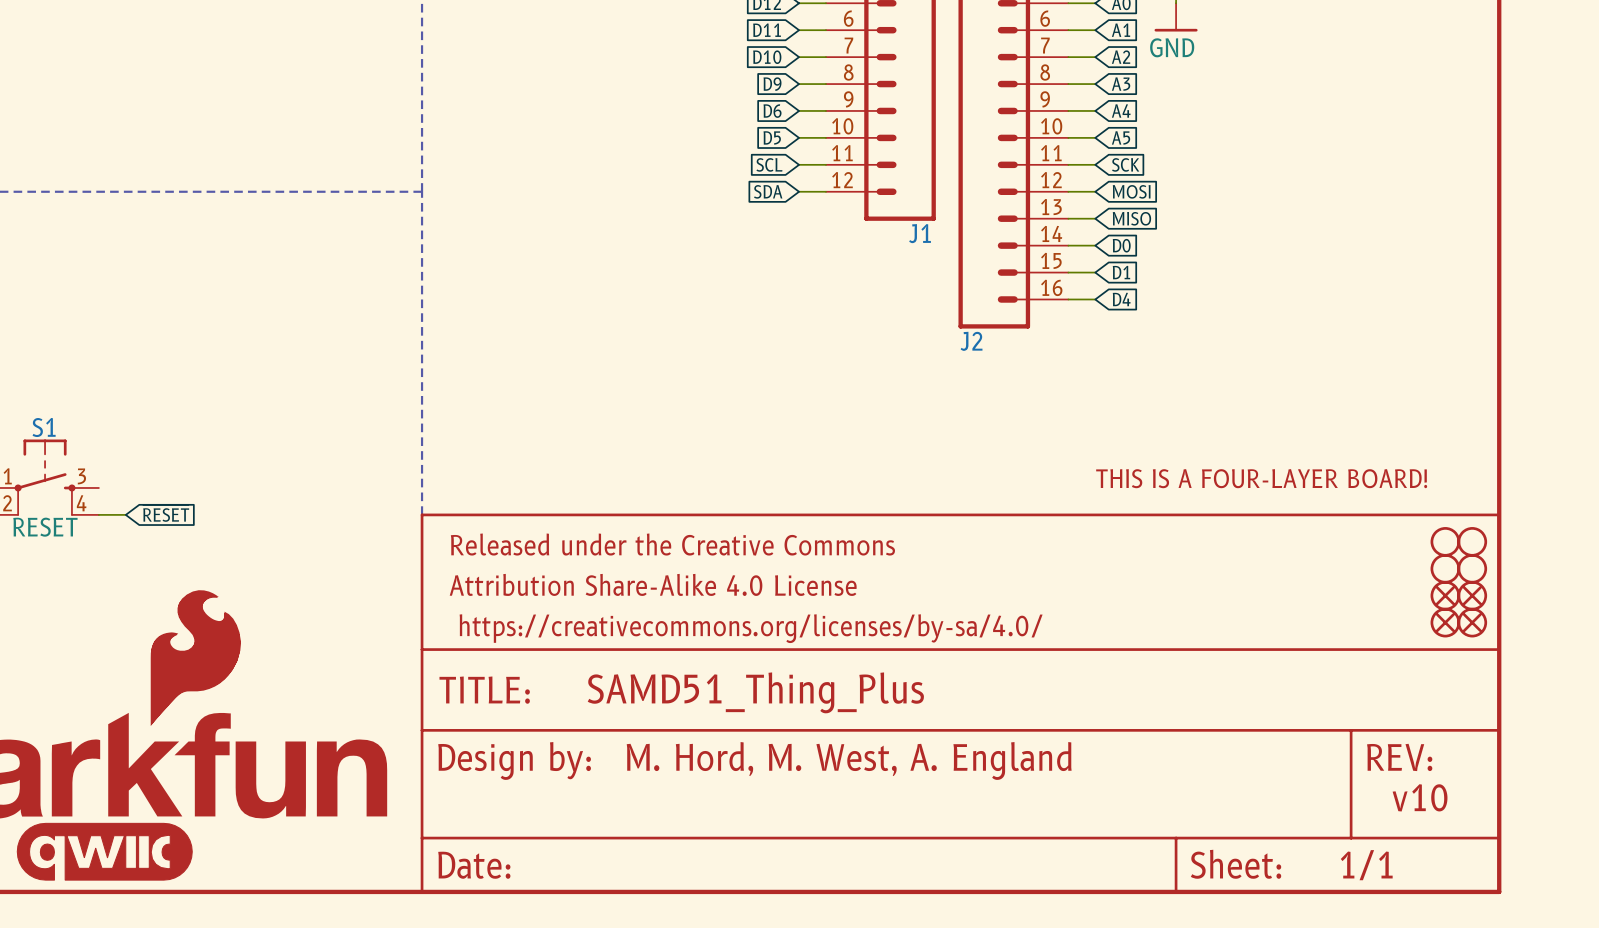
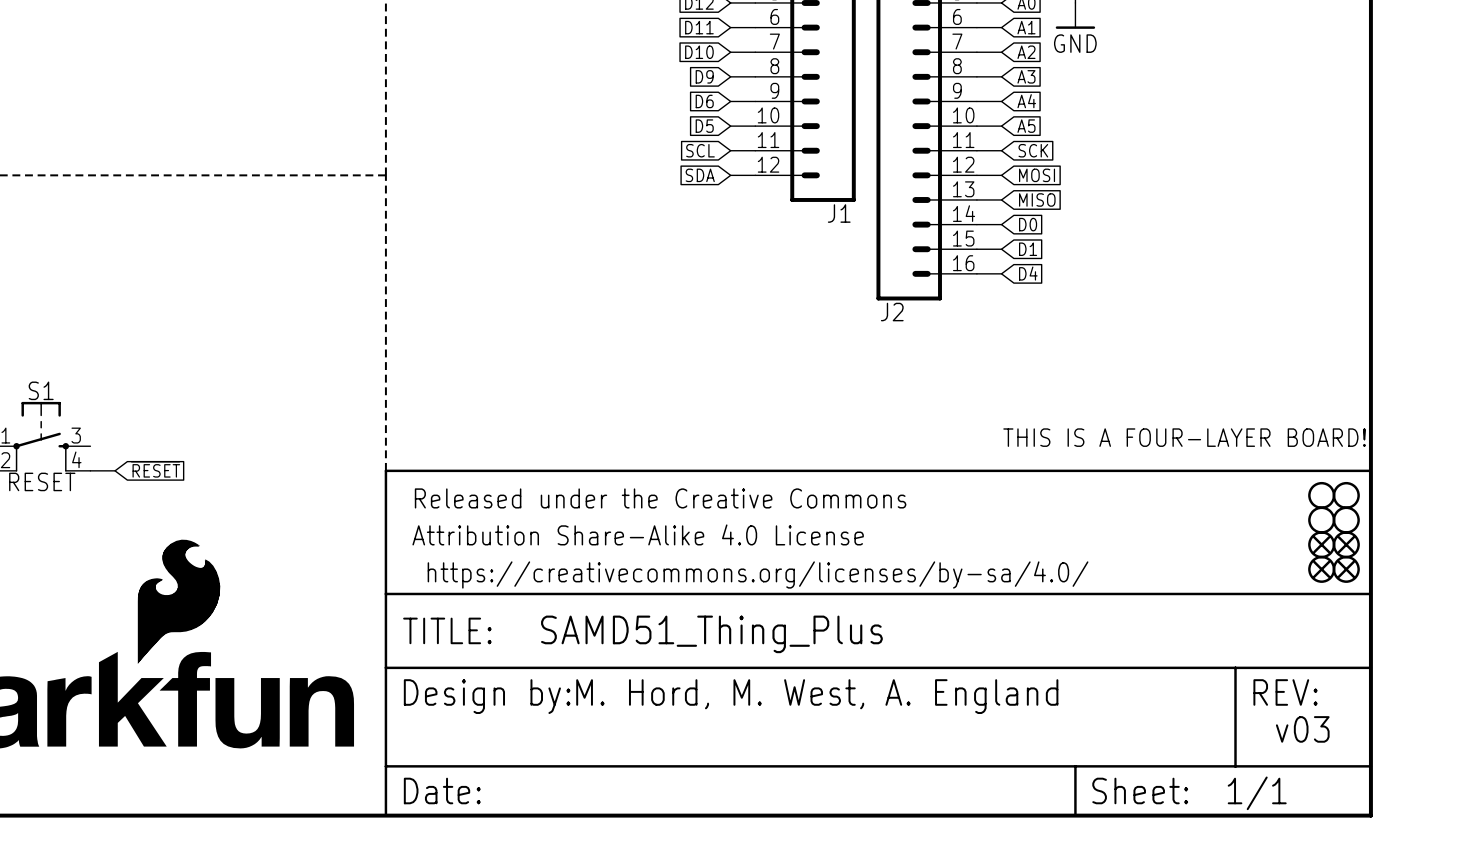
text: v10 (1420, 797) -> v03 (1302, 729)
part: (104, 851) -> none

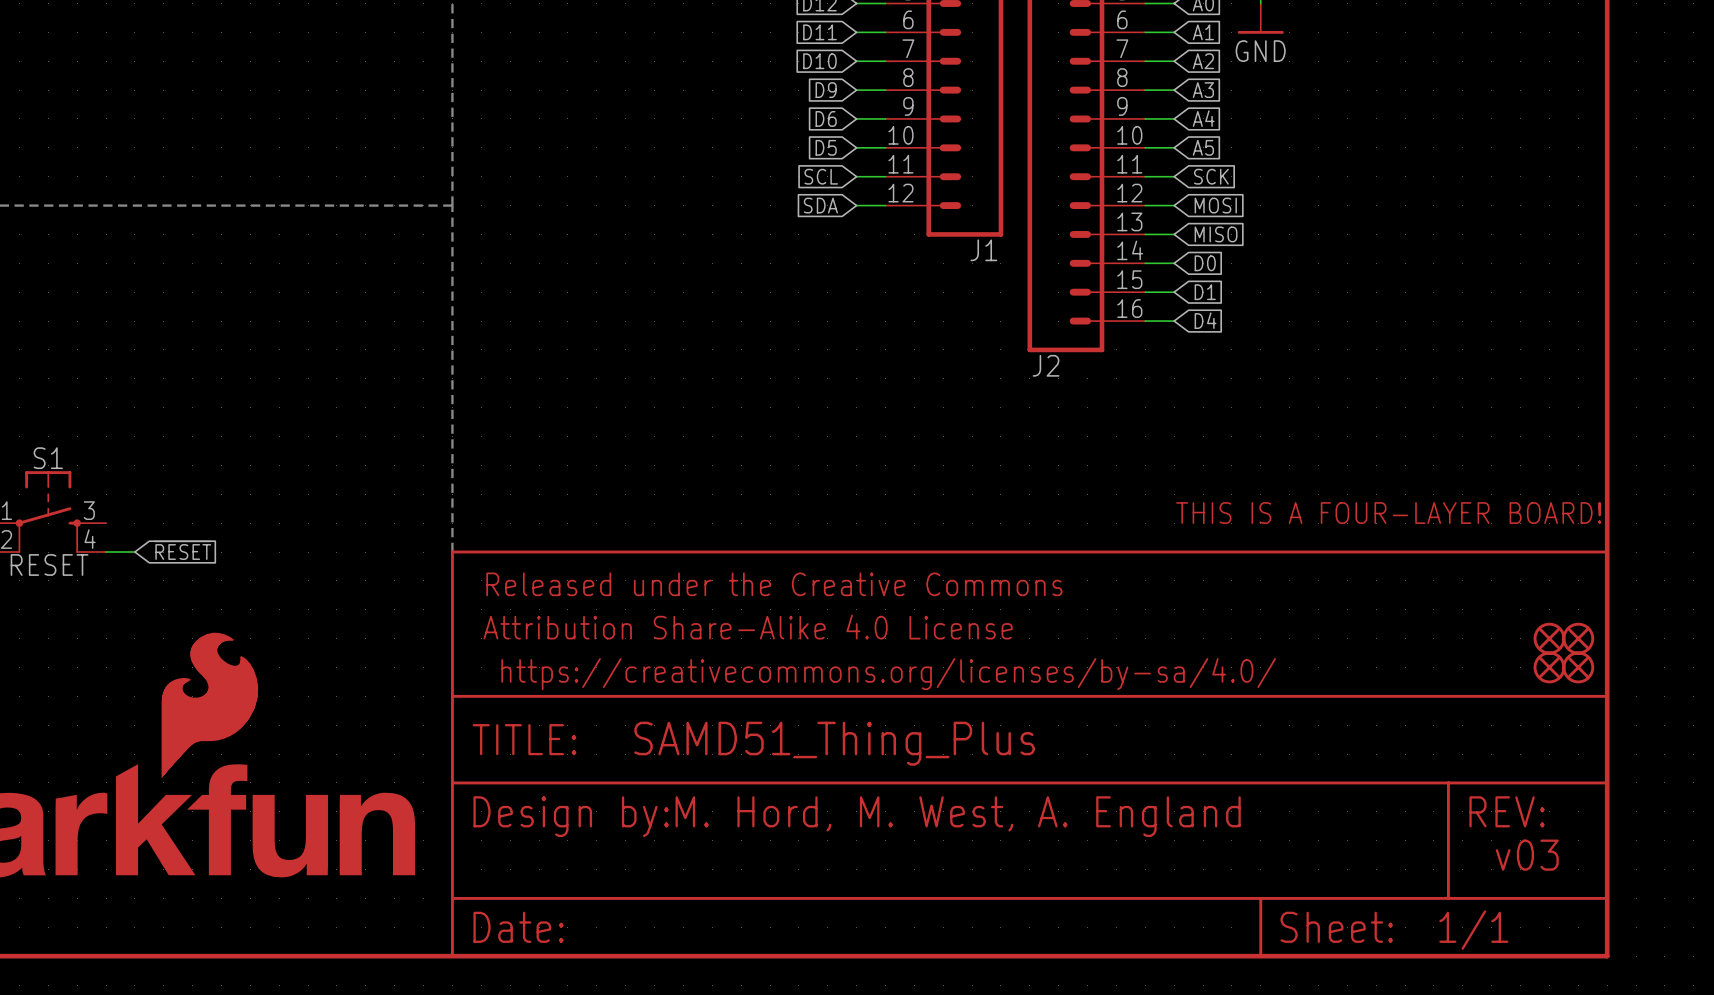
part: (1321, 495) -> none
part: (1346, 495) -> none
part: (1321, 520) -> none
part: (1346, 520) -> none

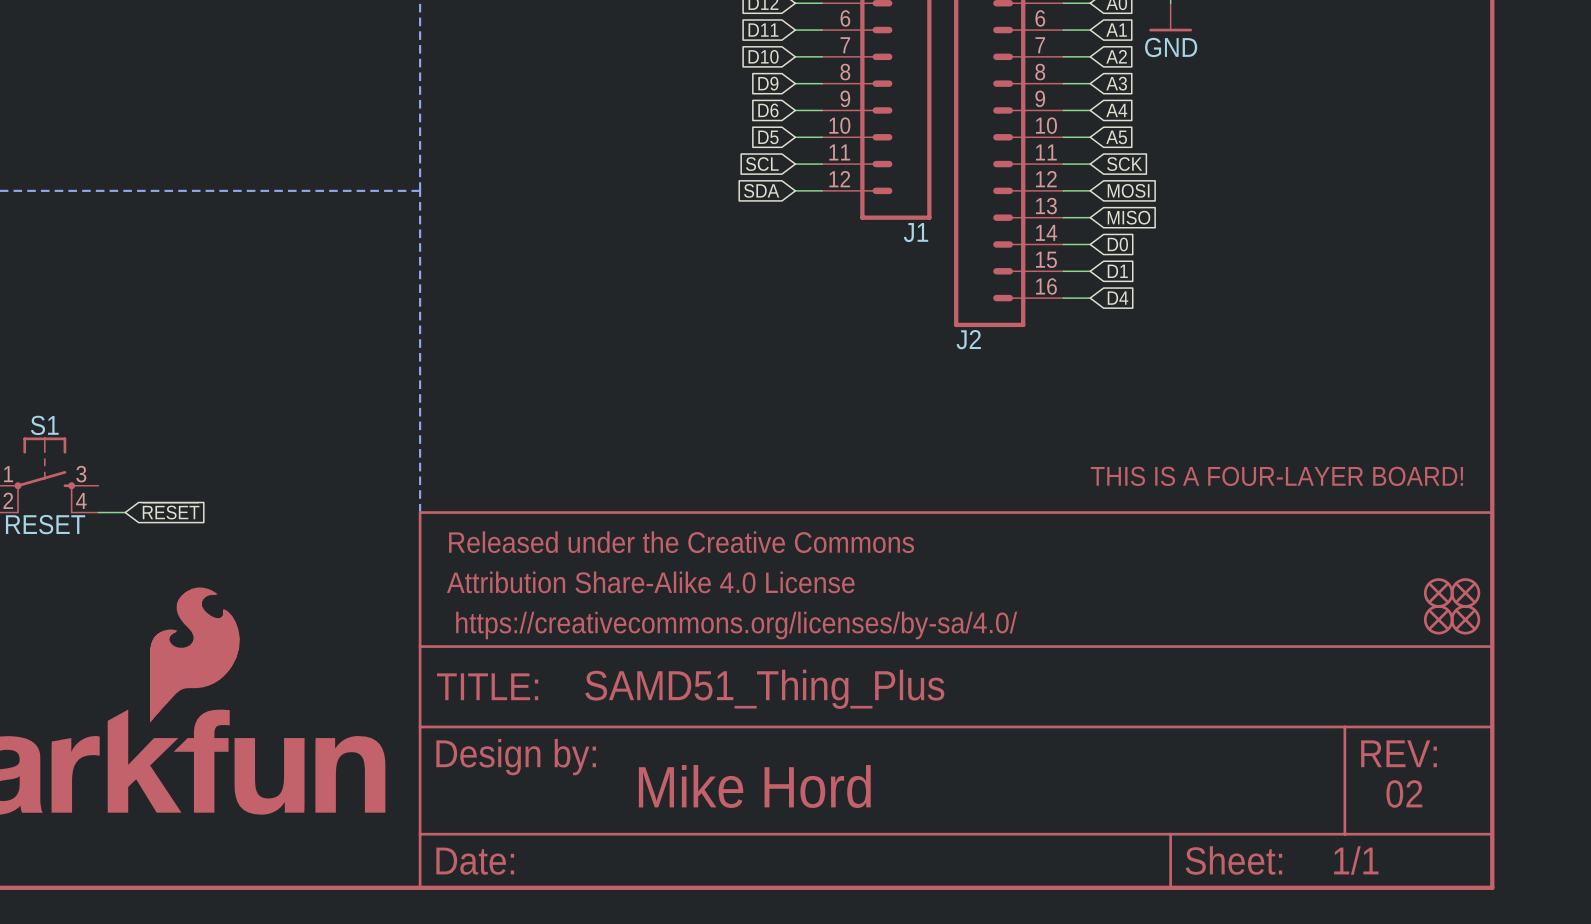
text: M. Hord, M. West, A. England (958, 816) -> none
text: none -> Mike Hord (754, 786)
text: v03 (1527, 855) -> 02 (1404, 793)

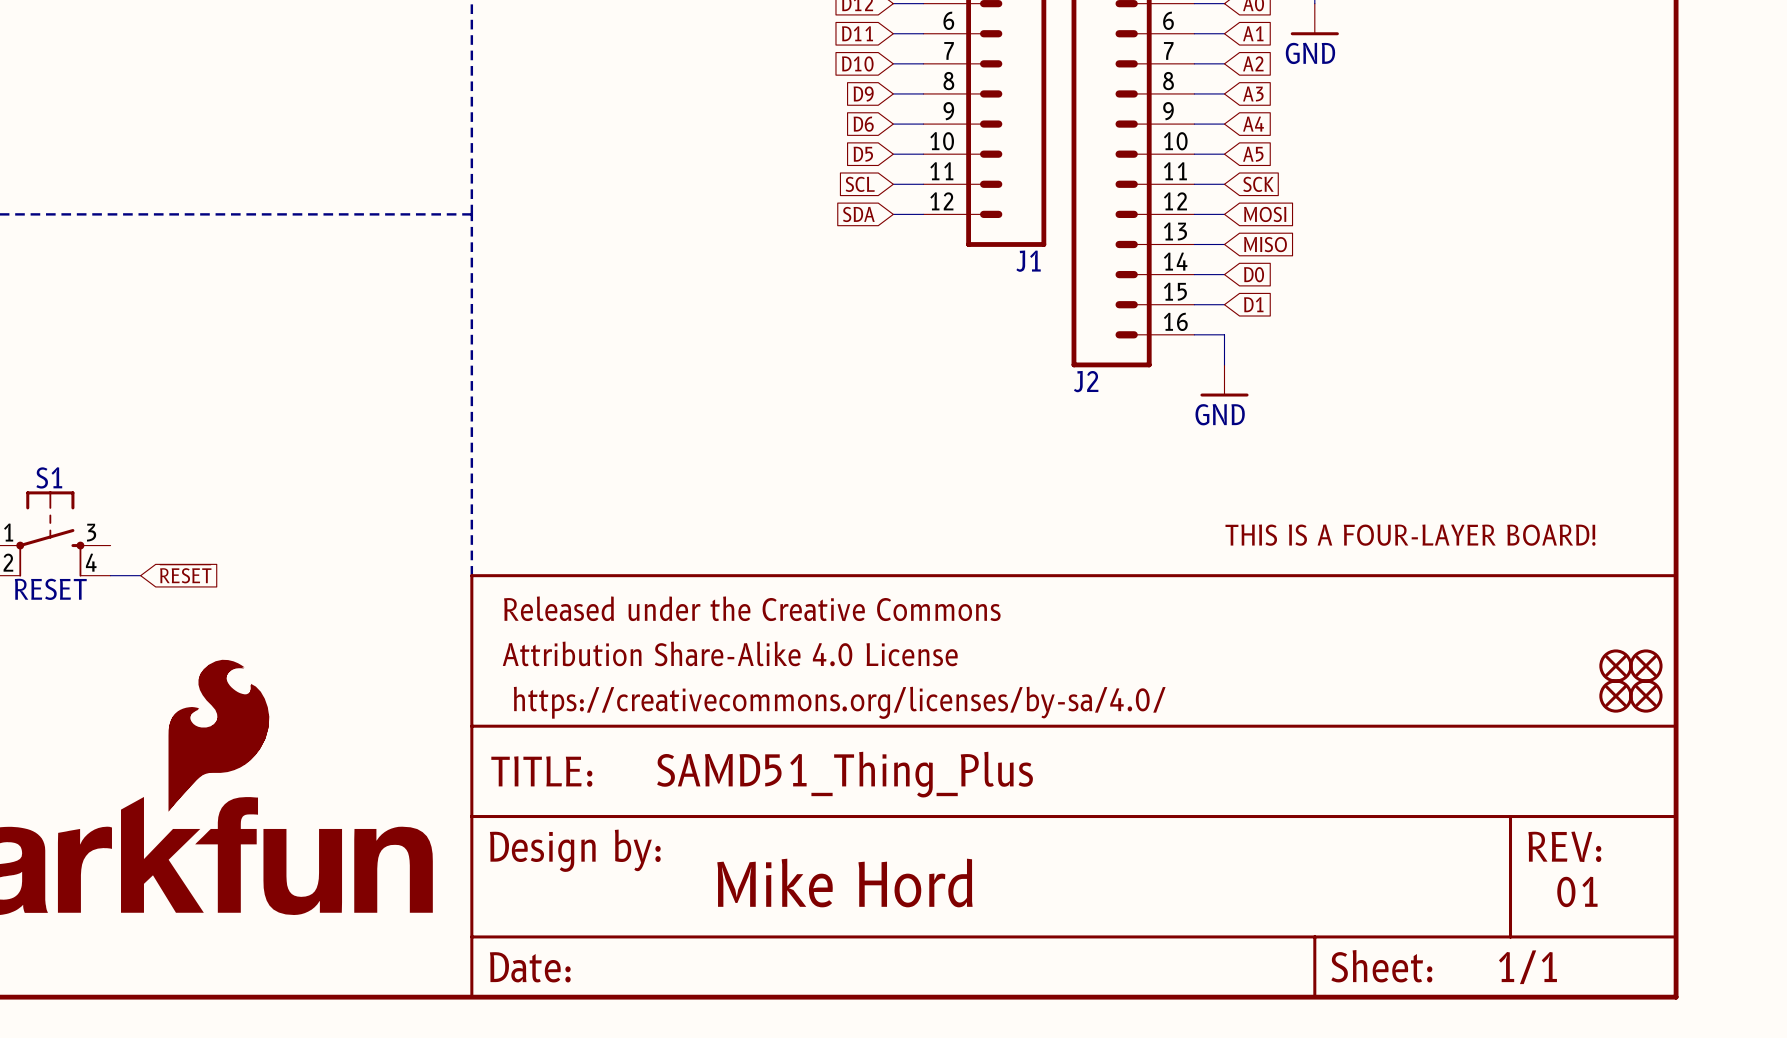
wire: none -> (1224, 334) (1224, 364)
global label: D4 (1117, 298) -> none
power symbol: none -> GND (1224, 380)
text: 02 (1404, 793) -> 01 (1577, 891)

